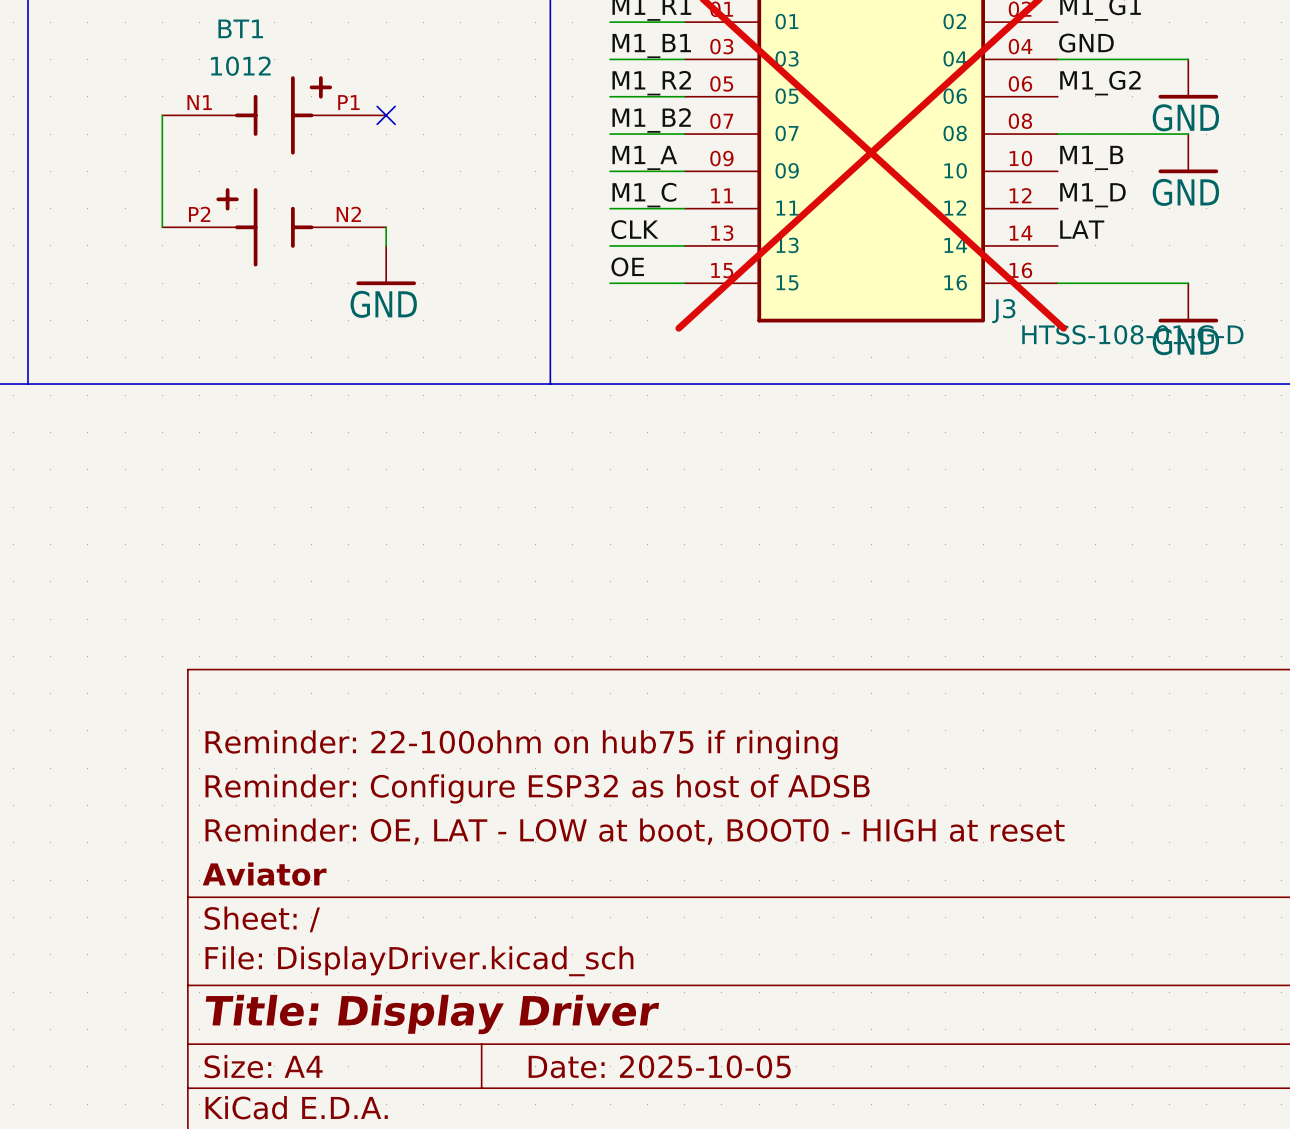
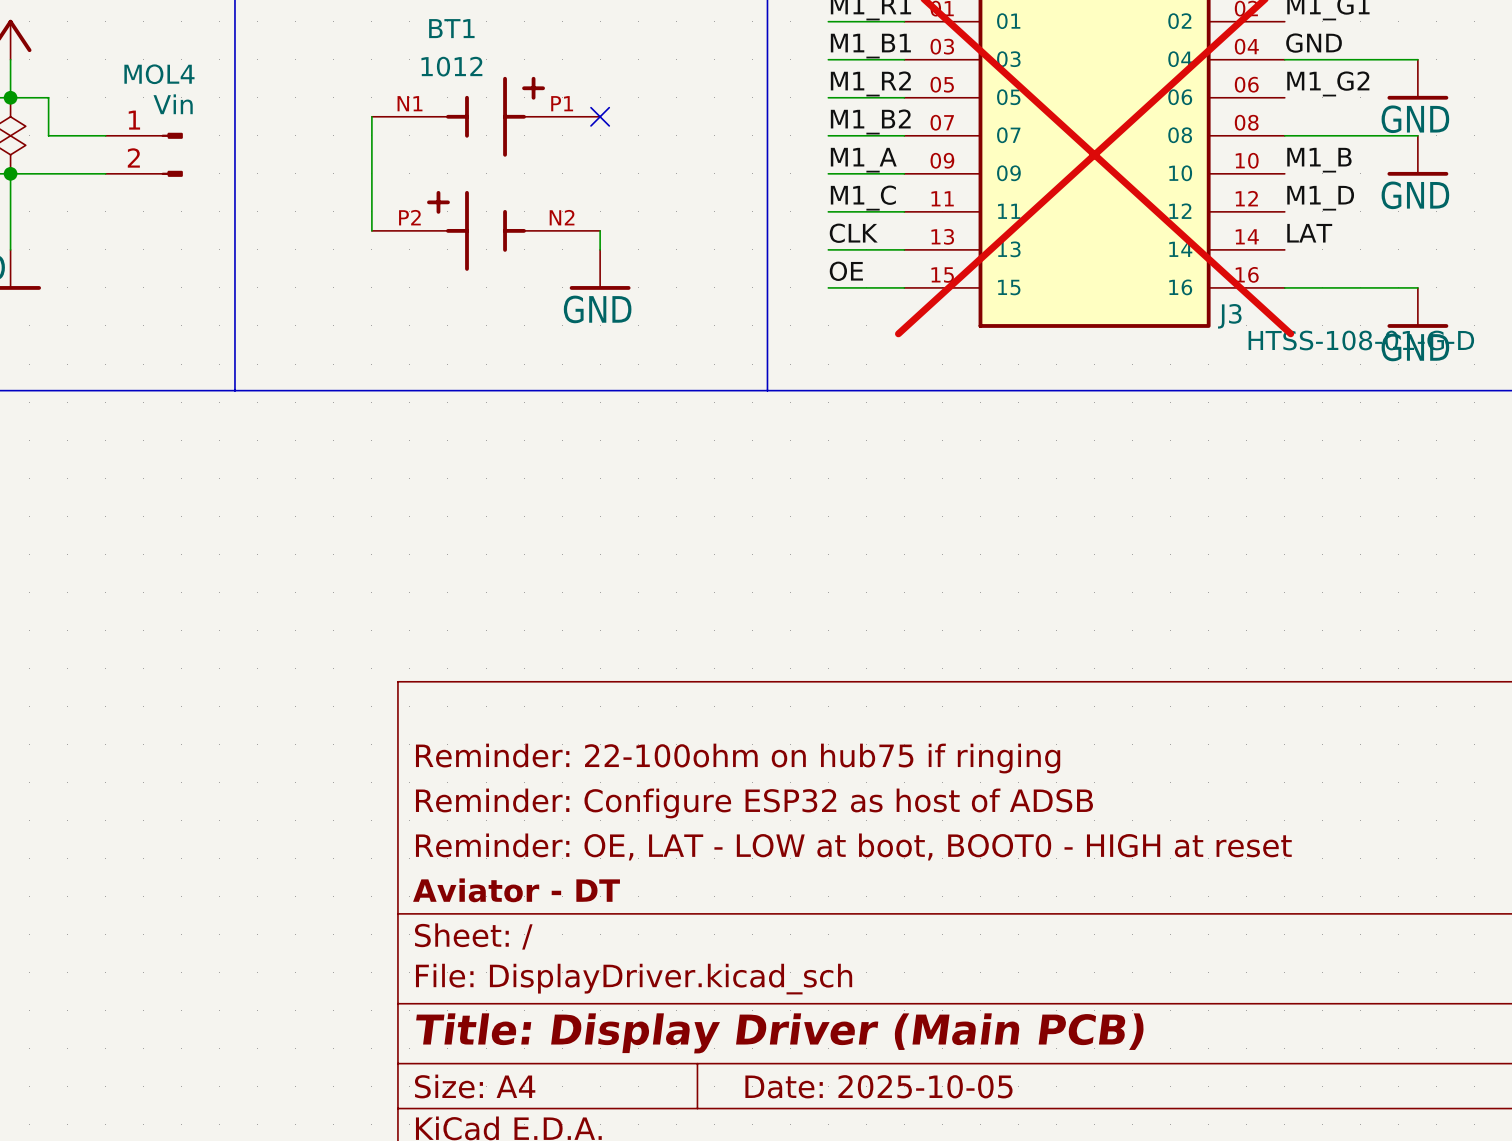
title block: Aviator (264, 874) -> Aviator - DT (516, 890)
title block: Title: Display Driver (432, 1014) -> Title: Display Driver (Main PCB) (780, 1033)

